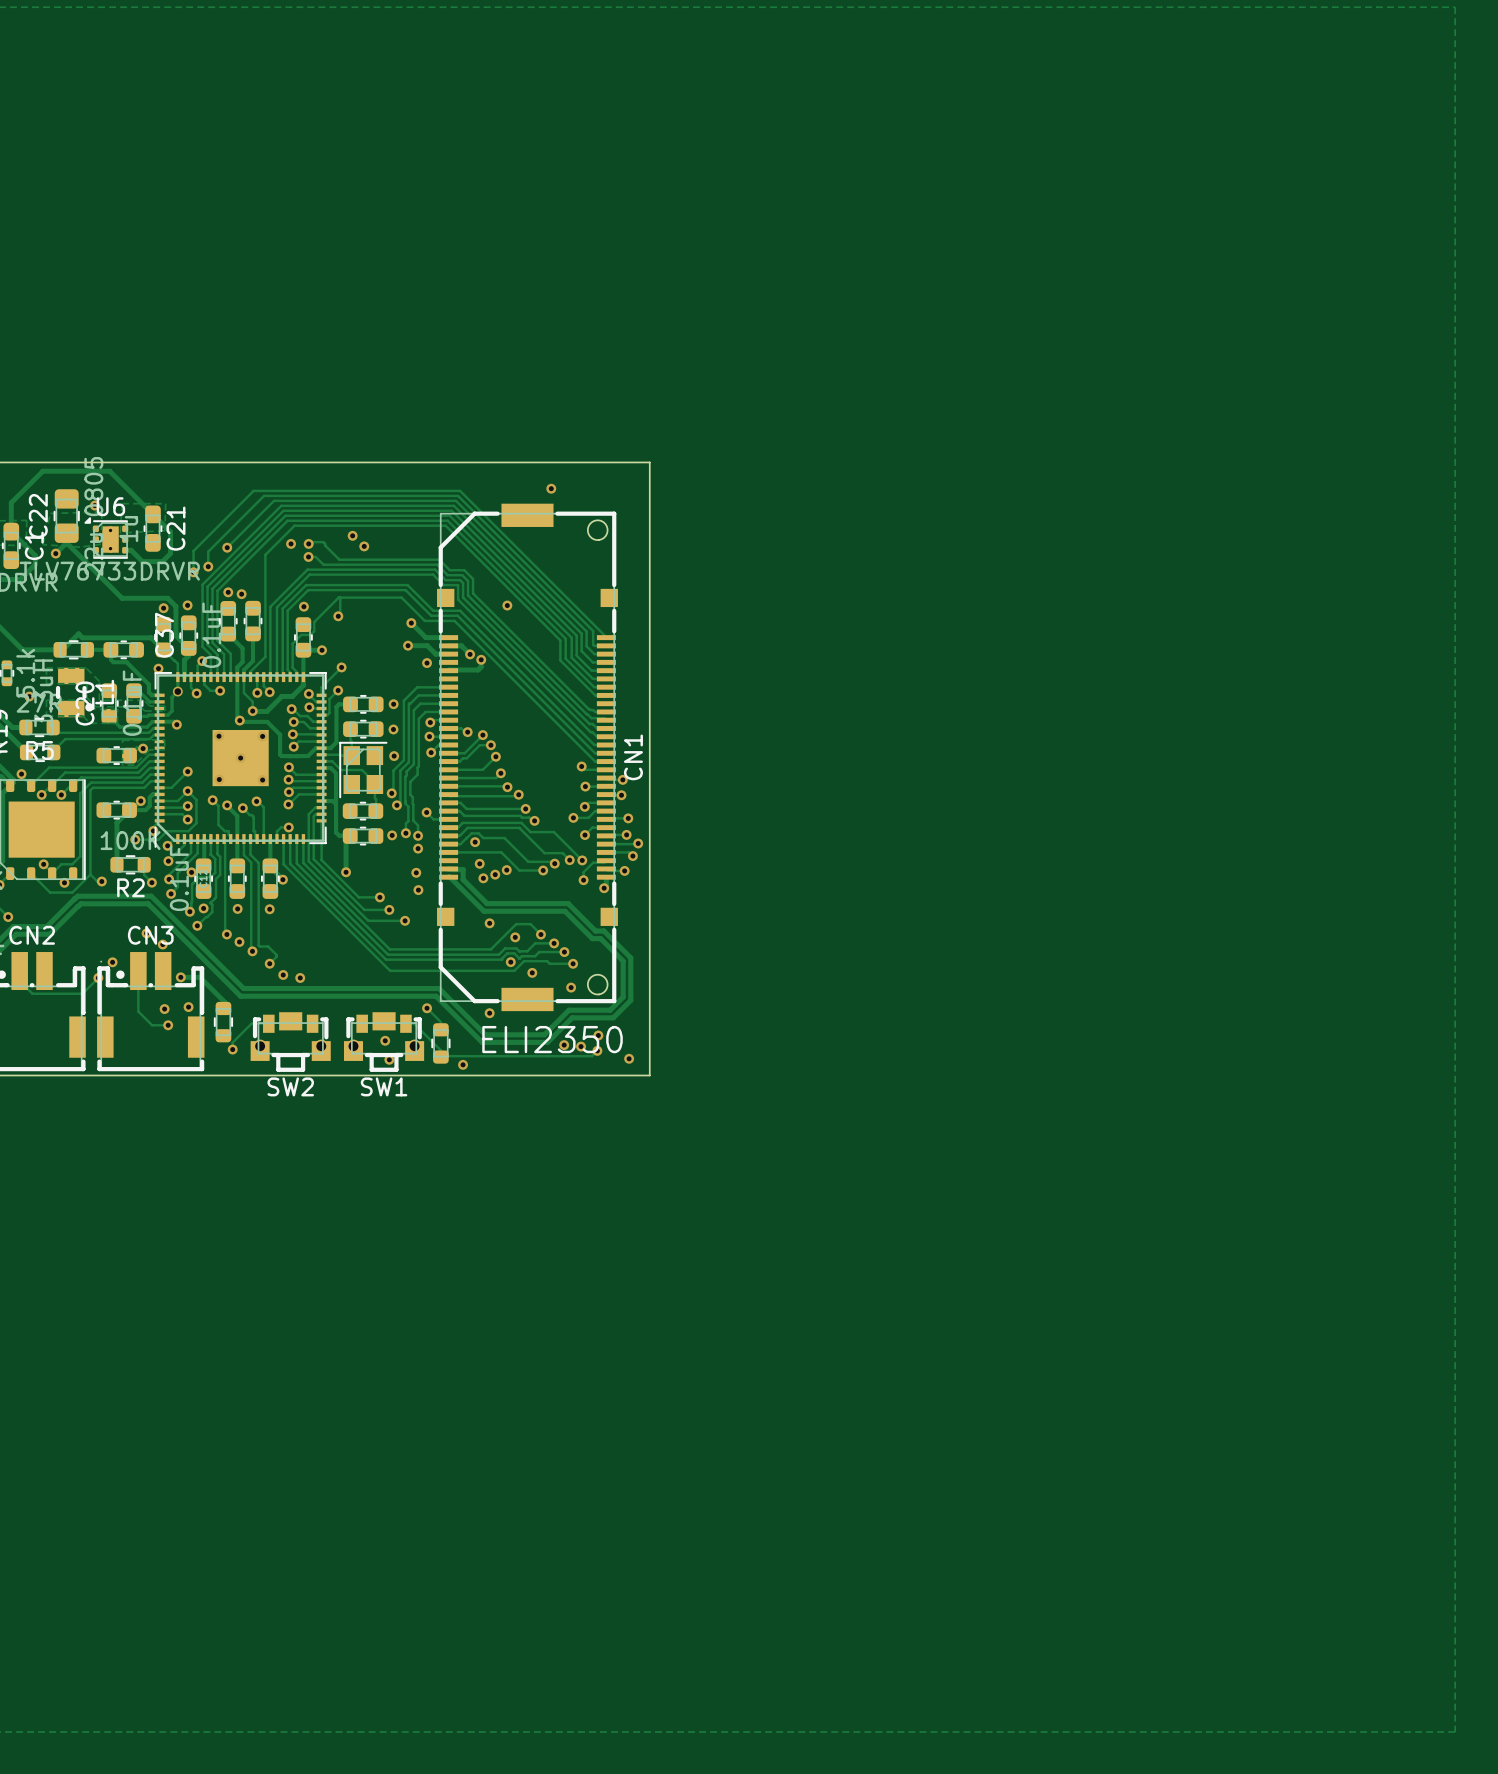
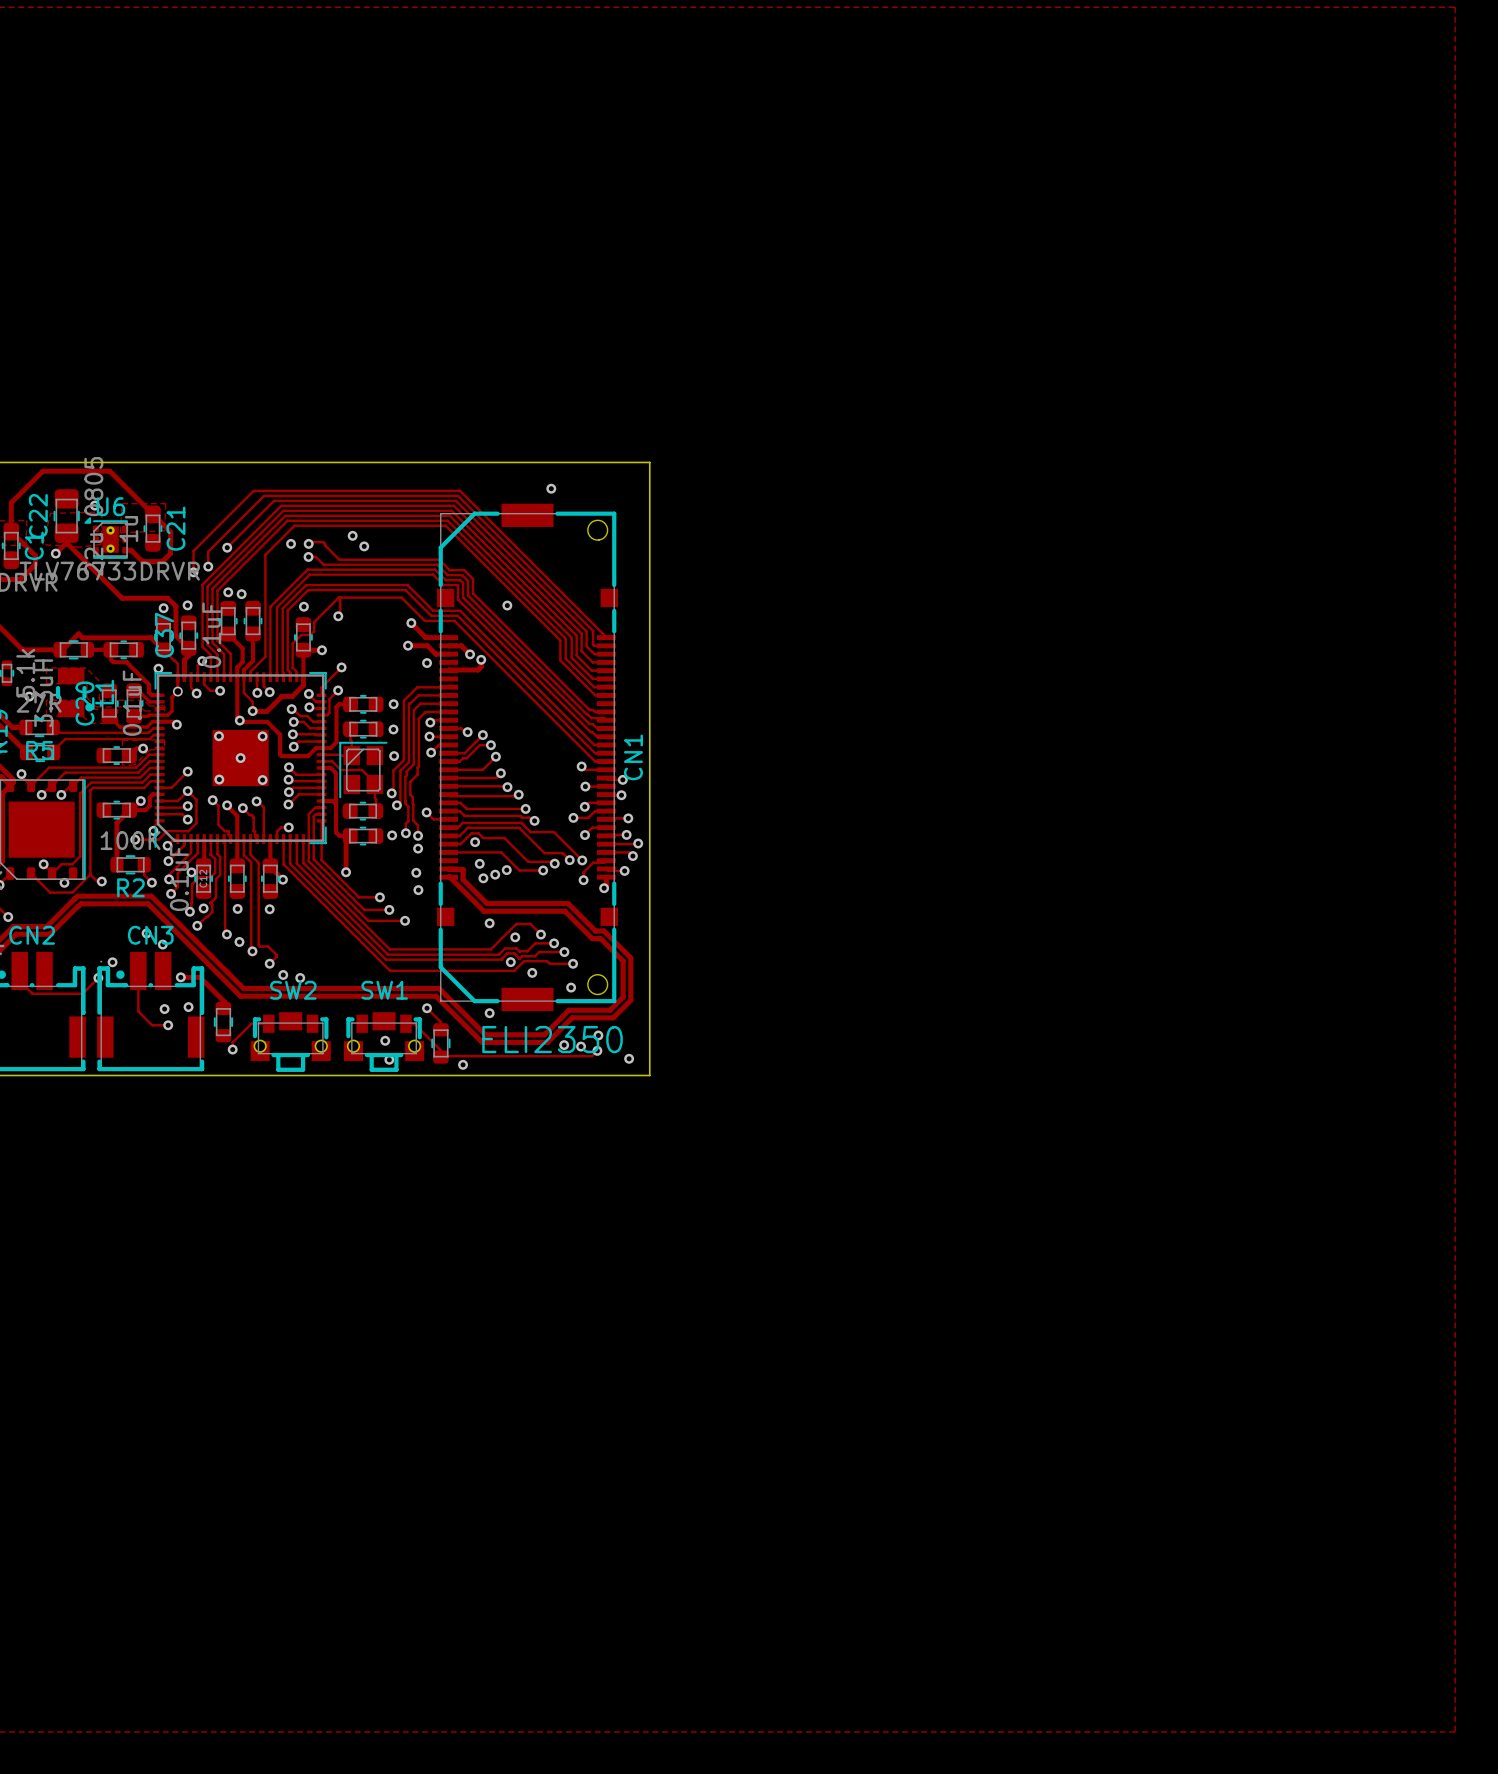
SW2 name position: SW2 (290, 1086) -> SW2 (293, 990)
SW1 name position: SW1 (384, 1086) -> SW1 (384, 990)

